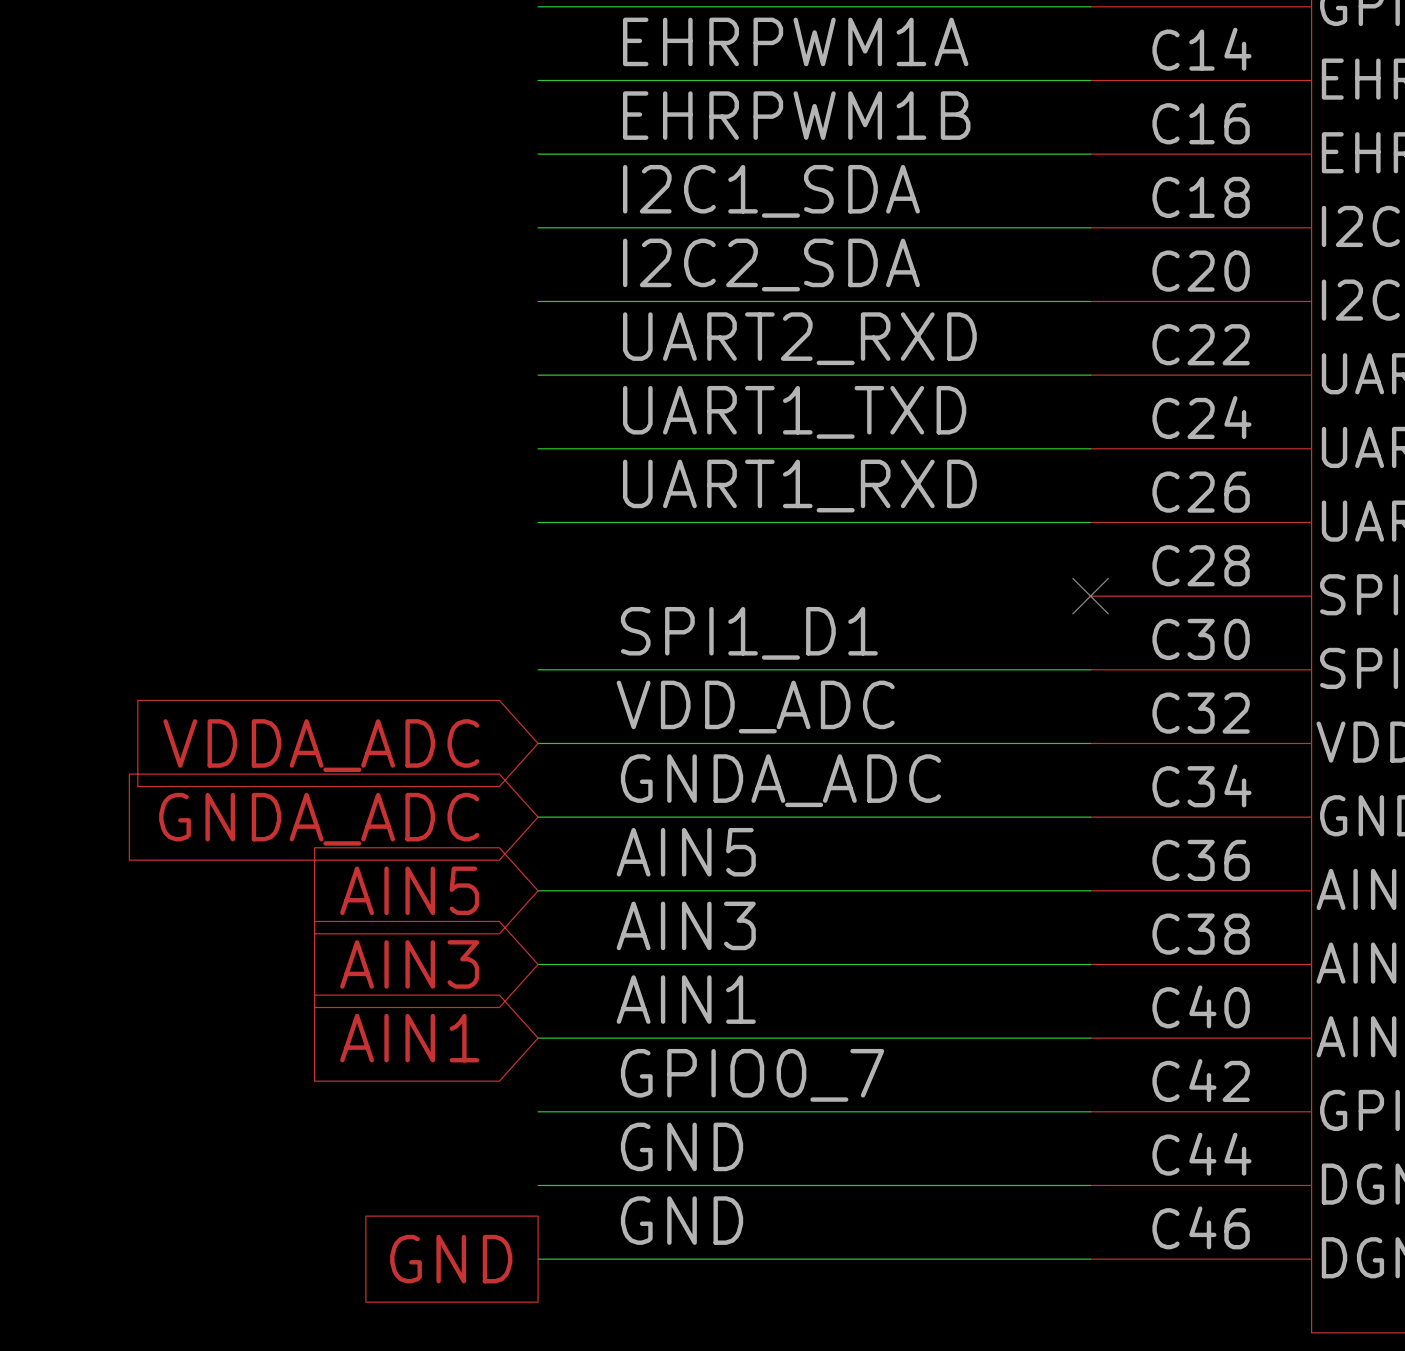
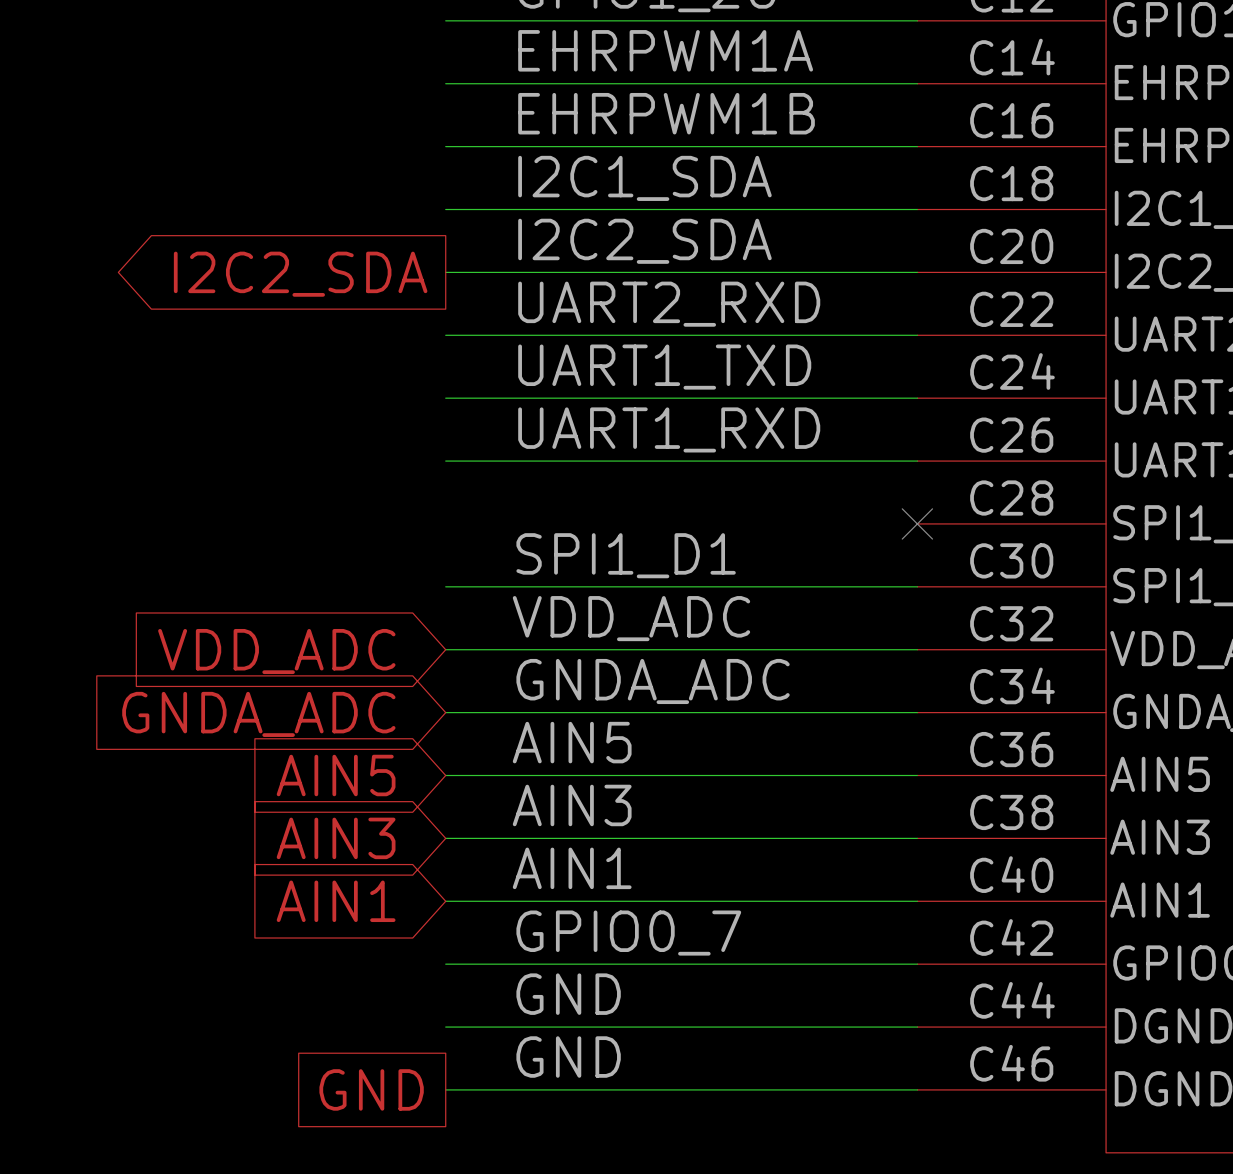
global label: none -> I2C2_SDA (300, 274)
global label: VDDA_ADC (321, 745) -> VDD_ADC (276, 651)

